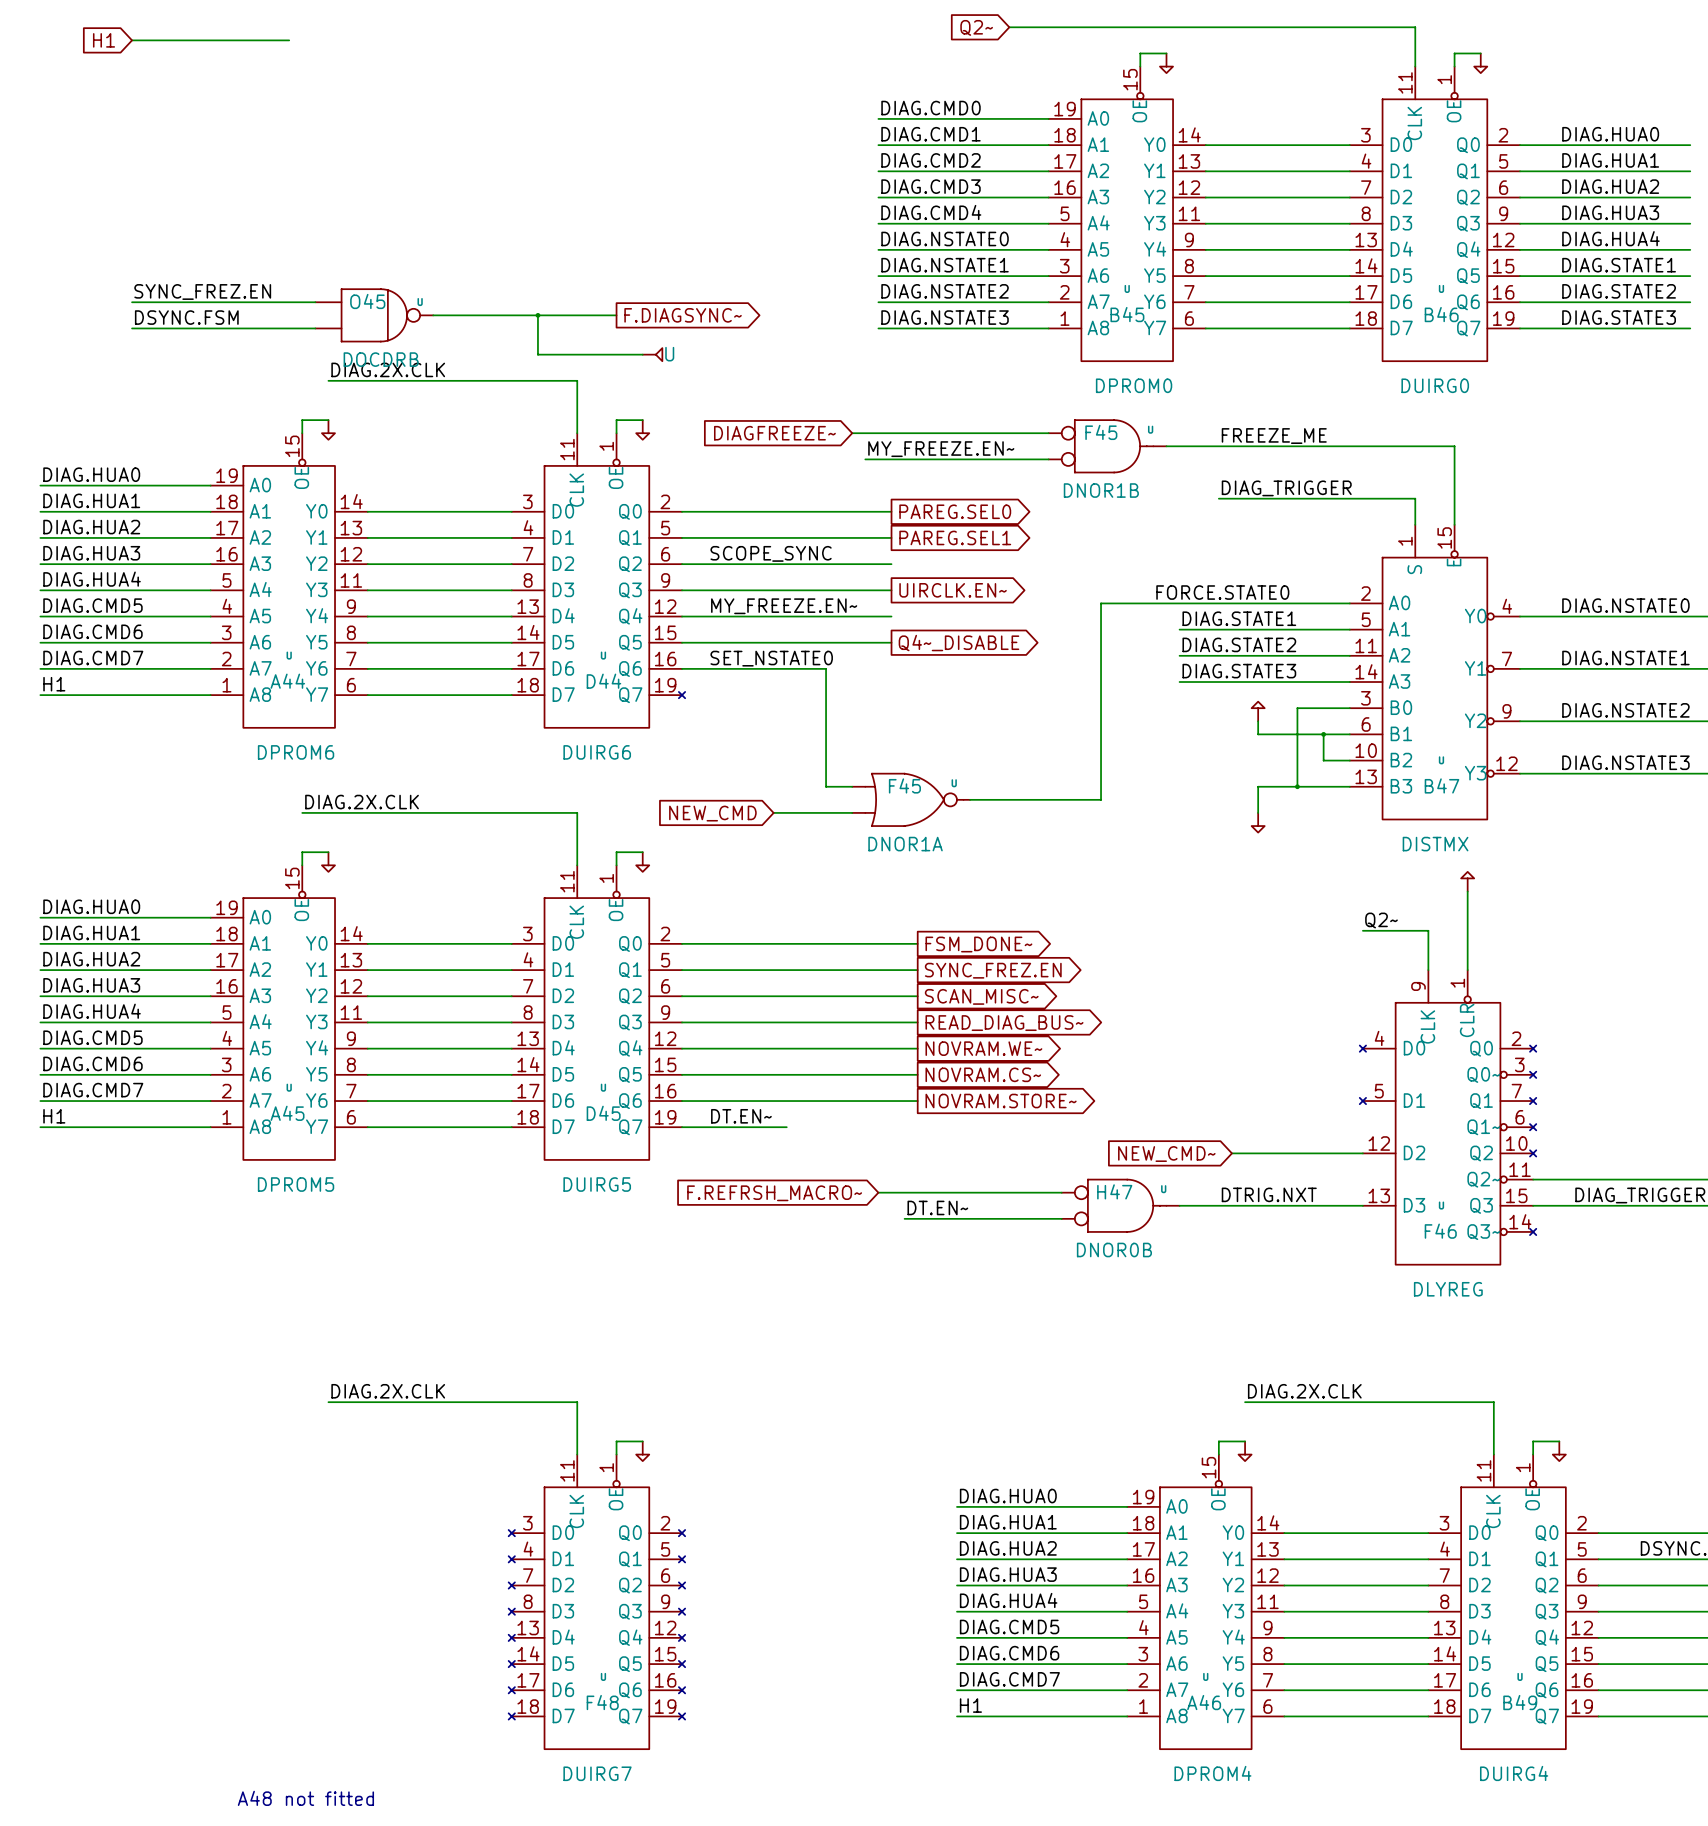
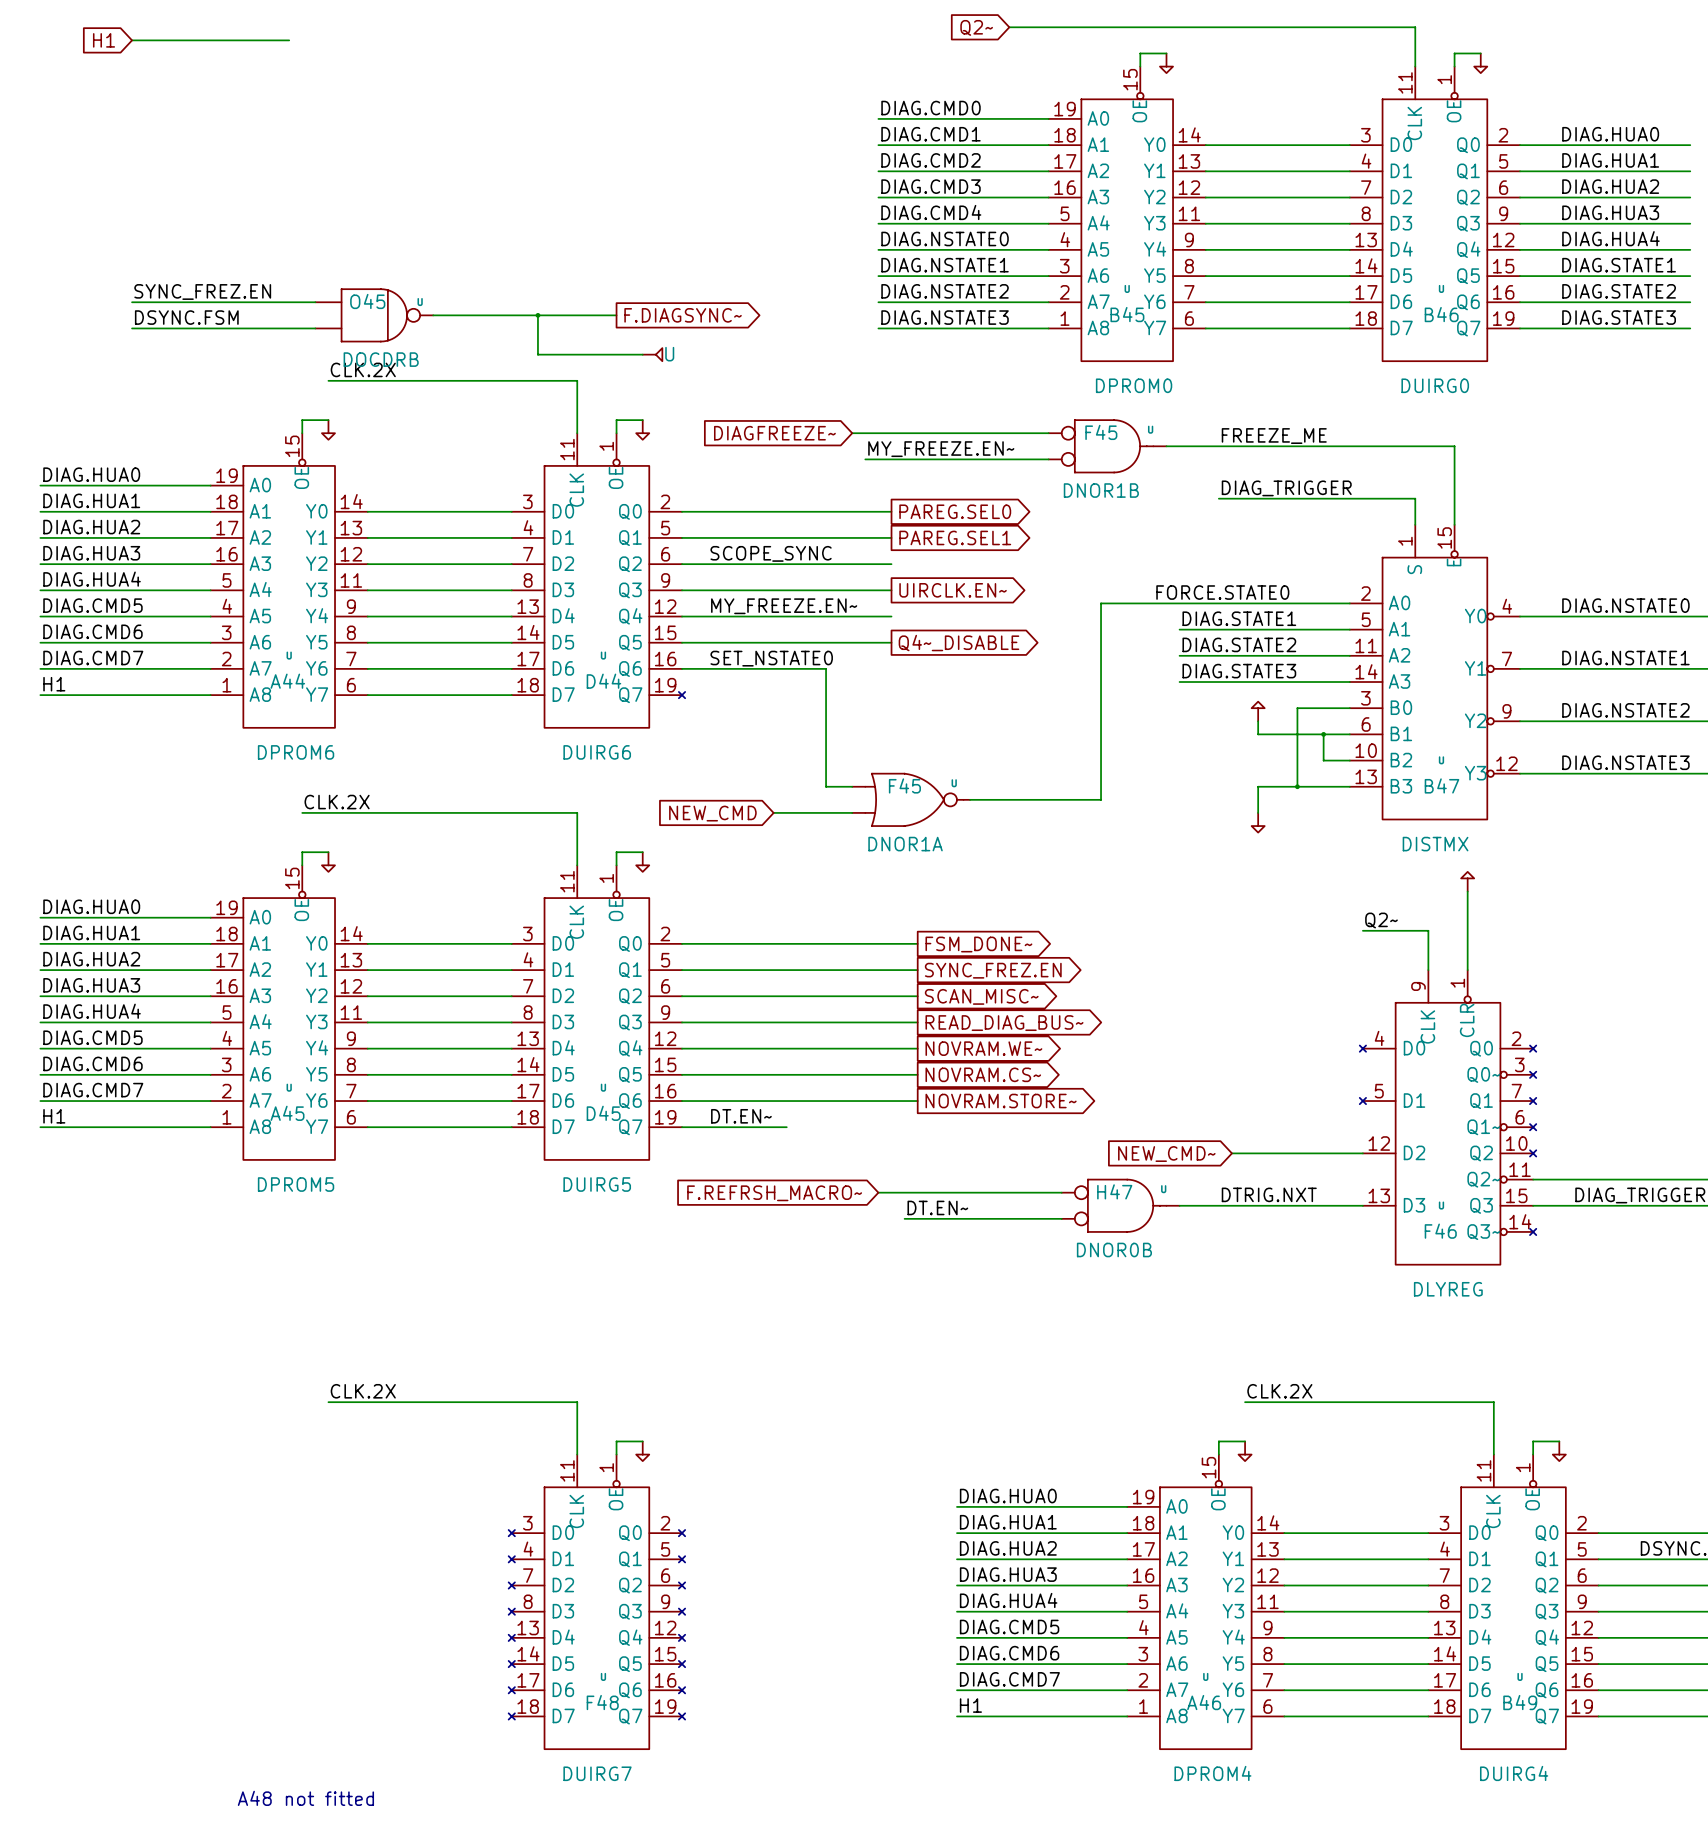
label: DIAG.2X.CLK (388, 369) -> CLK.2X (363, 369)
label: DIAG.2X.CLK (362, 802) -> CLK.2X (337, 802)
label: DIAG.2X.CLK (388, 1391) -> CLK.2X (363, 1391)
label: DIAG.2X.CLK (1304, 1391) -> CLK.2X (1279, 1391)

